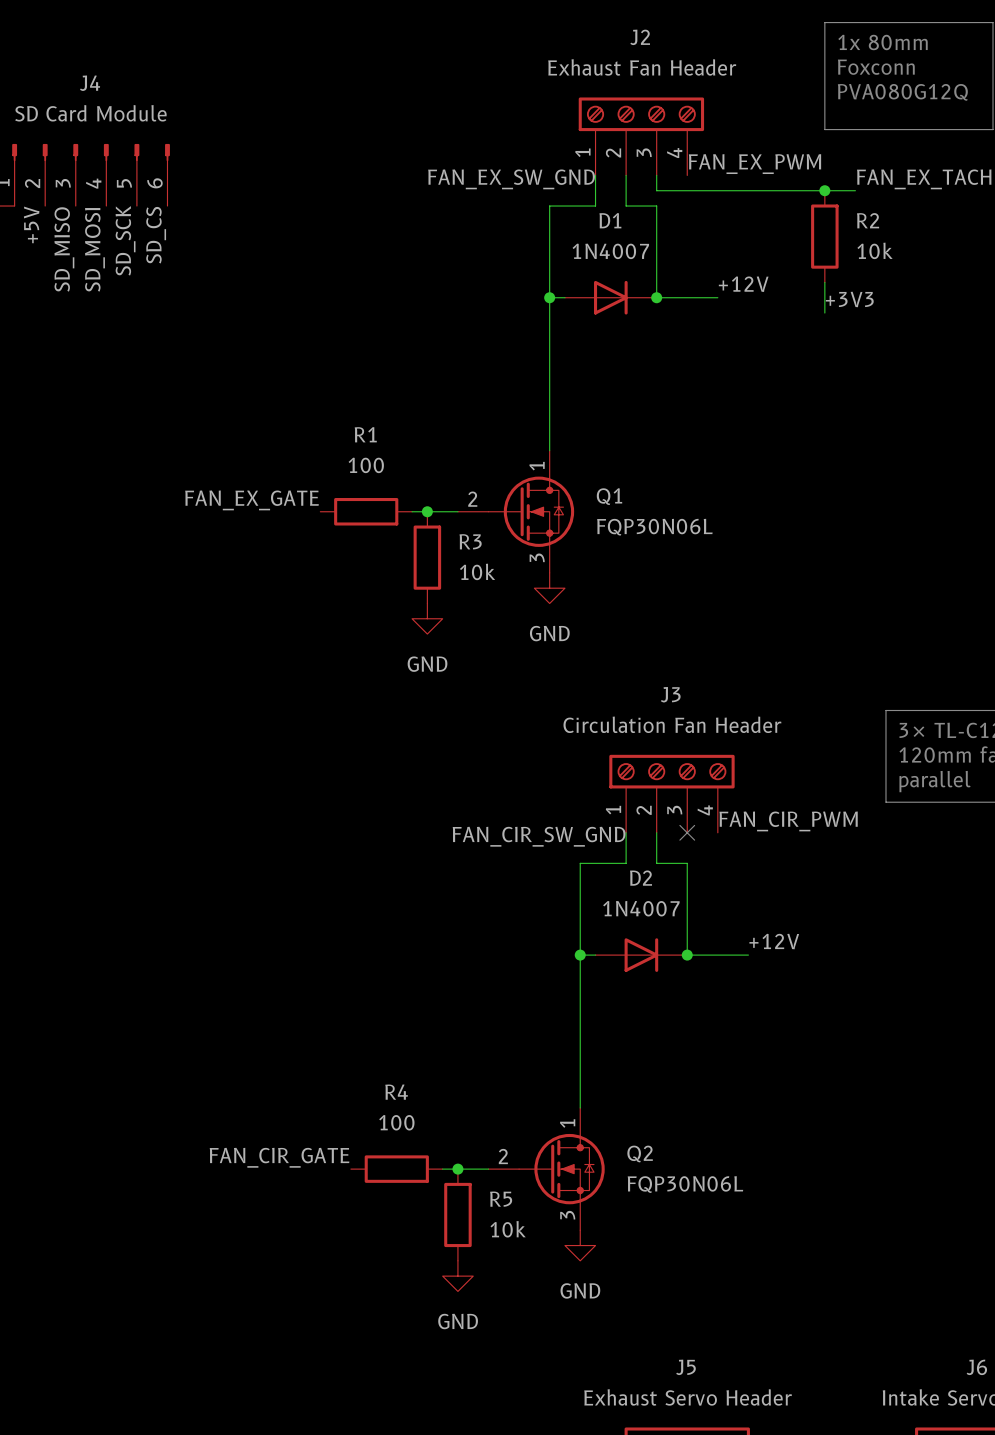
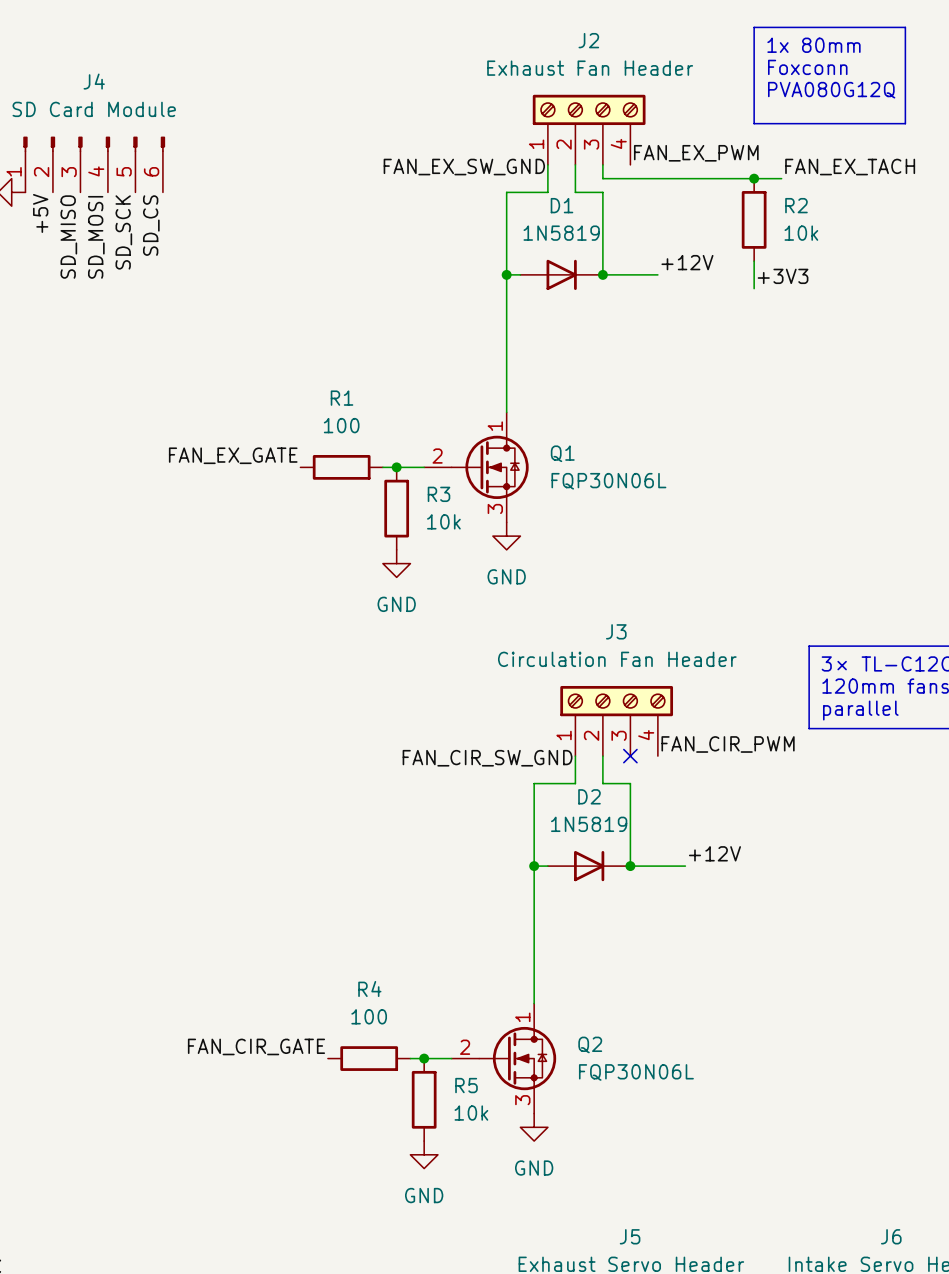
D1 value: 1N4007 (610, 251) -> 1N5819 (561, 233)
D2 value: 1N4007 (641, 908) -> 1N5819 (589, 824)

